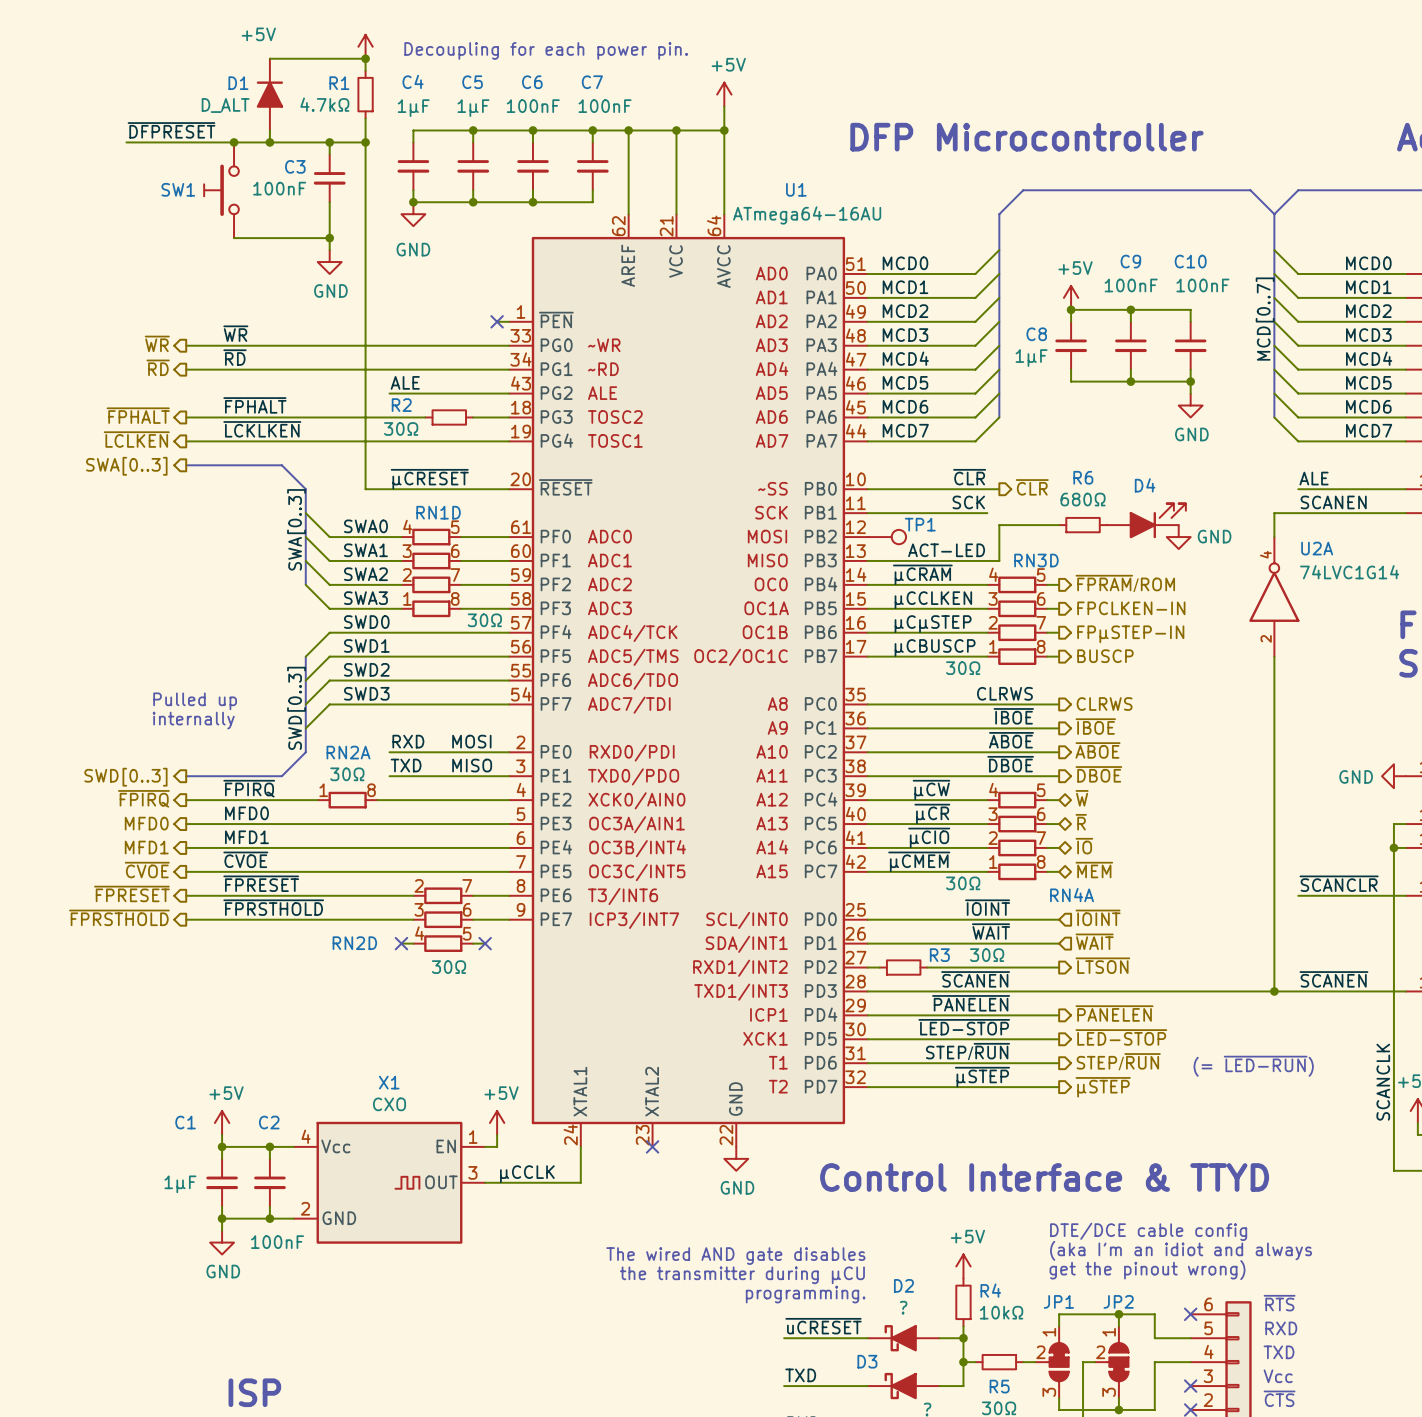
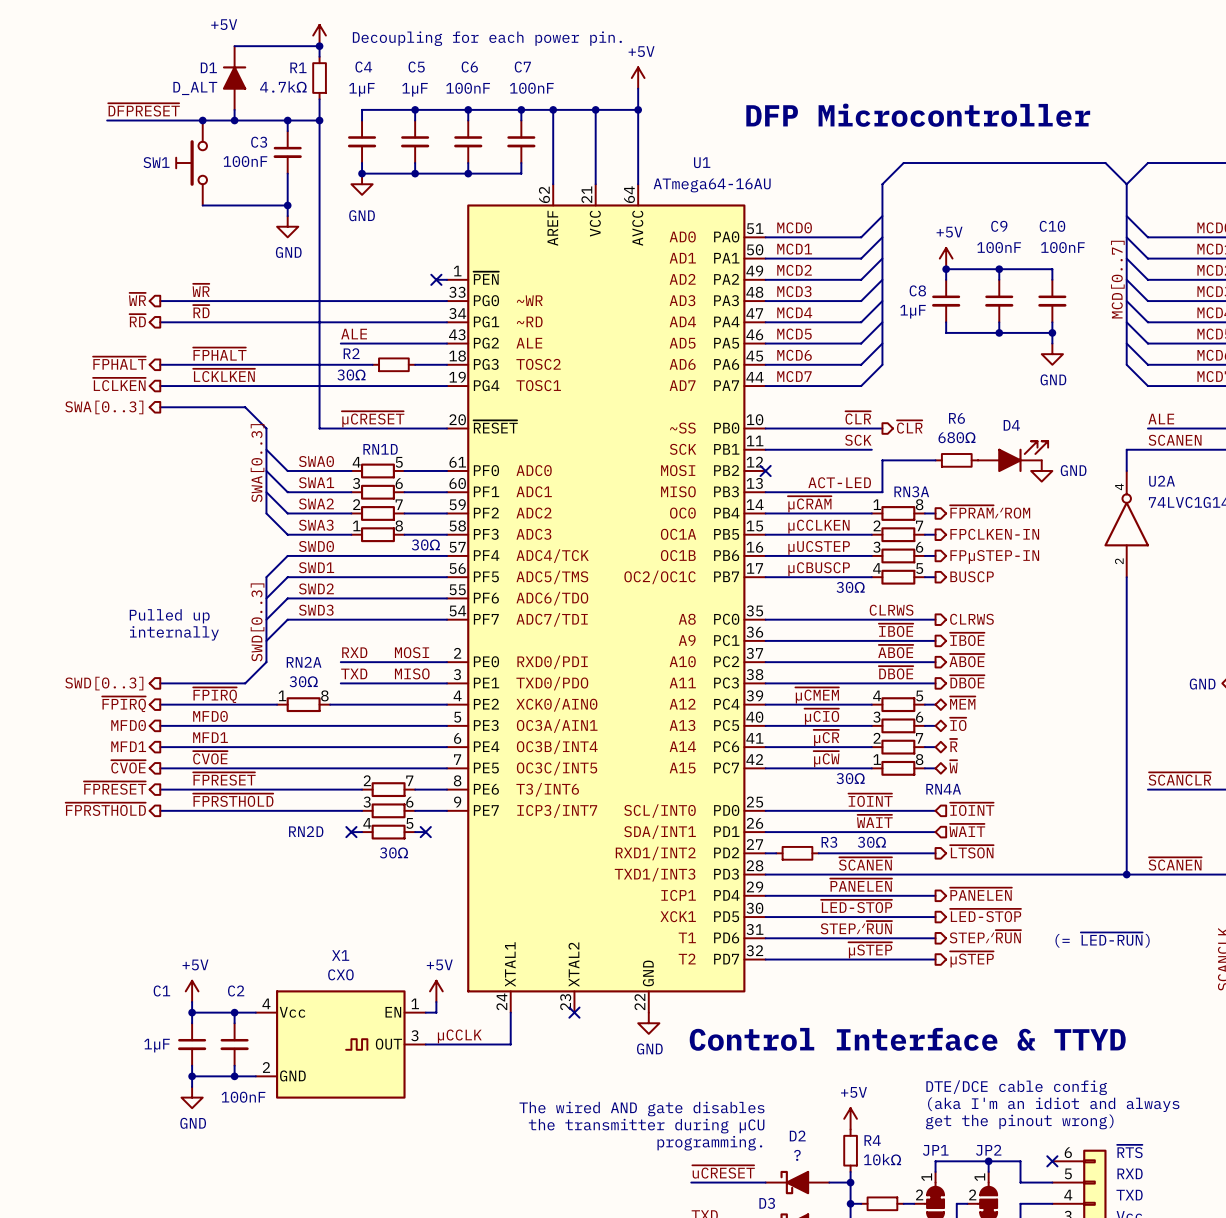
no-connect mark: none -> (765, 470)
TP1: (886, 537) -> none
RN3D name: RN3D (1036, 560) -> RN3A (911, 491)
RN3D pin number: 4 (993, 574) -> 1 (877, 504)
RN3D pin number: 5 (1041, 575) -> 8 (919, 504)
part pin number: 3 (993, 598) -> 2 (877, 525)
part pin number: 6 (1041, 598) -> 7 (919, 525)
part pin number: 2 (993, 622) -> 3 (876, 547)
part pin number: 7 (1041, 622) -> 6 (919, 547)
label: µCµSTEP (933, 624) -> µUCSTEP (819, 547)
part pin number: 1 (993, 646) -> 4 (877, 568)
part pin number: 8 (1041, 646) -> 5 (919, 568)
label: ~{µCW} (931, 790) -> ~{µCMEM} (817, 695)
hierarchical label: ~{W} (1082, 798) -> ~{MEM} (962, 703)
label: ~{µCR} (932, 813) -> ~{µCIO} (821, 716)
hierarchical label: ~{R} (1081, 822) -> ~{IO} (958, 724)
label: ~{µCIO} (929, 837) -> ~{µCR} (826, 737)
hierarchical label: ~{IO} (1084, 846) -> ~{R} (953, 745)
label: ~{µCMEM} (919, 861) -> ~{µCW} (826, 759)
hierarchical label: ~{MEM} (1094, 870) -> ~{W} (953, 766)

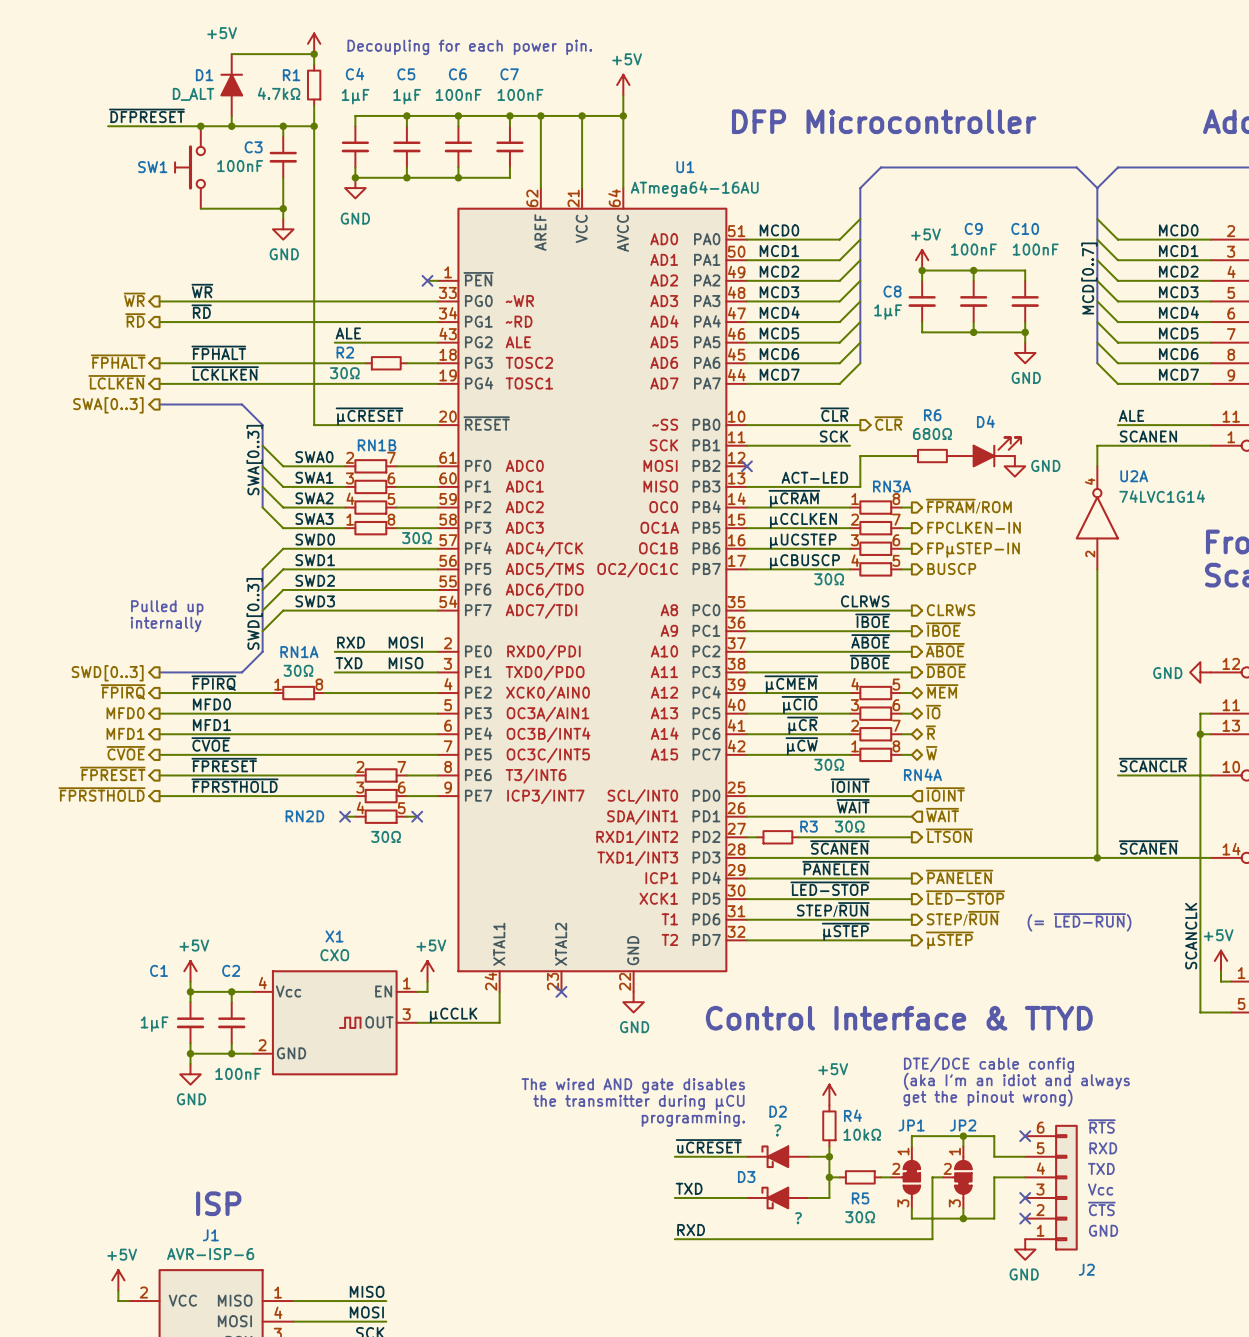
RN1D name: RN1D (380, 449) -> RN1B (377, 445)
RN1D pin number: 4 (356, 462) -> 2 (349, 457)
RN1D pin number: 5 (399, 462) -> 7 (391, 457)
part pin number: 2 (356, 504) -> 4 (350, 498)
part pin number: 7 (399, 504) -> 5 (391, 499)
RN2A name: RN2A (304, 662) -> RN1A (299, 652)

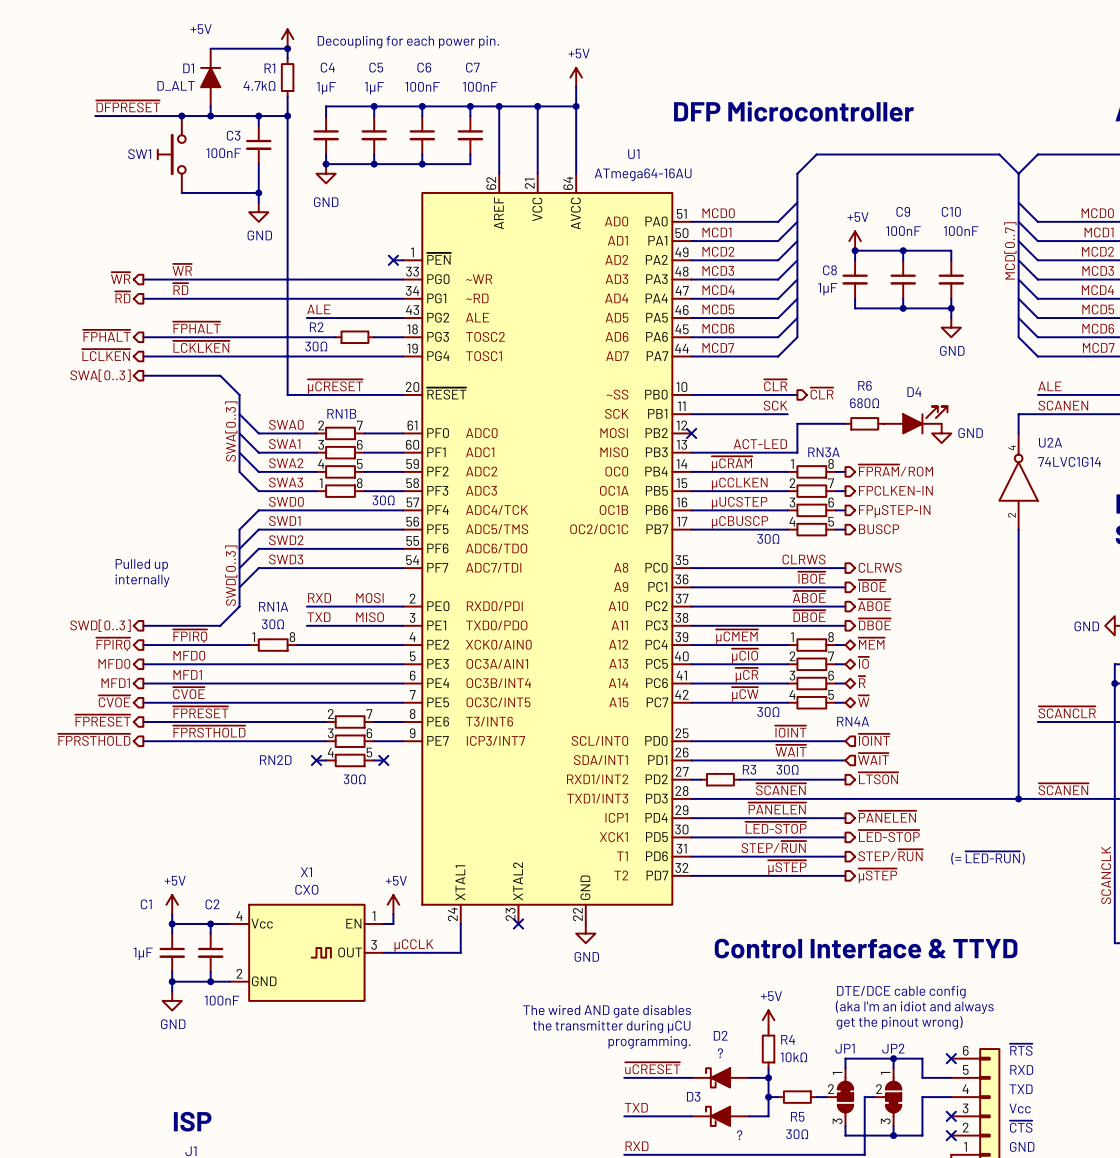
part position: (875, 693) -> (811, 702)
part pin number: 3 (854, 705) -> 2 (792, 656)
part pin number: 6 (896, 705) -> 7 (831, 656)
part pin number: 2 (854, 725) -> 3 (792, 675)
part pin number: 7 (896, 725) -> 6 (831, 675)
RN4A position: (875, 754) -> (811, 645)

